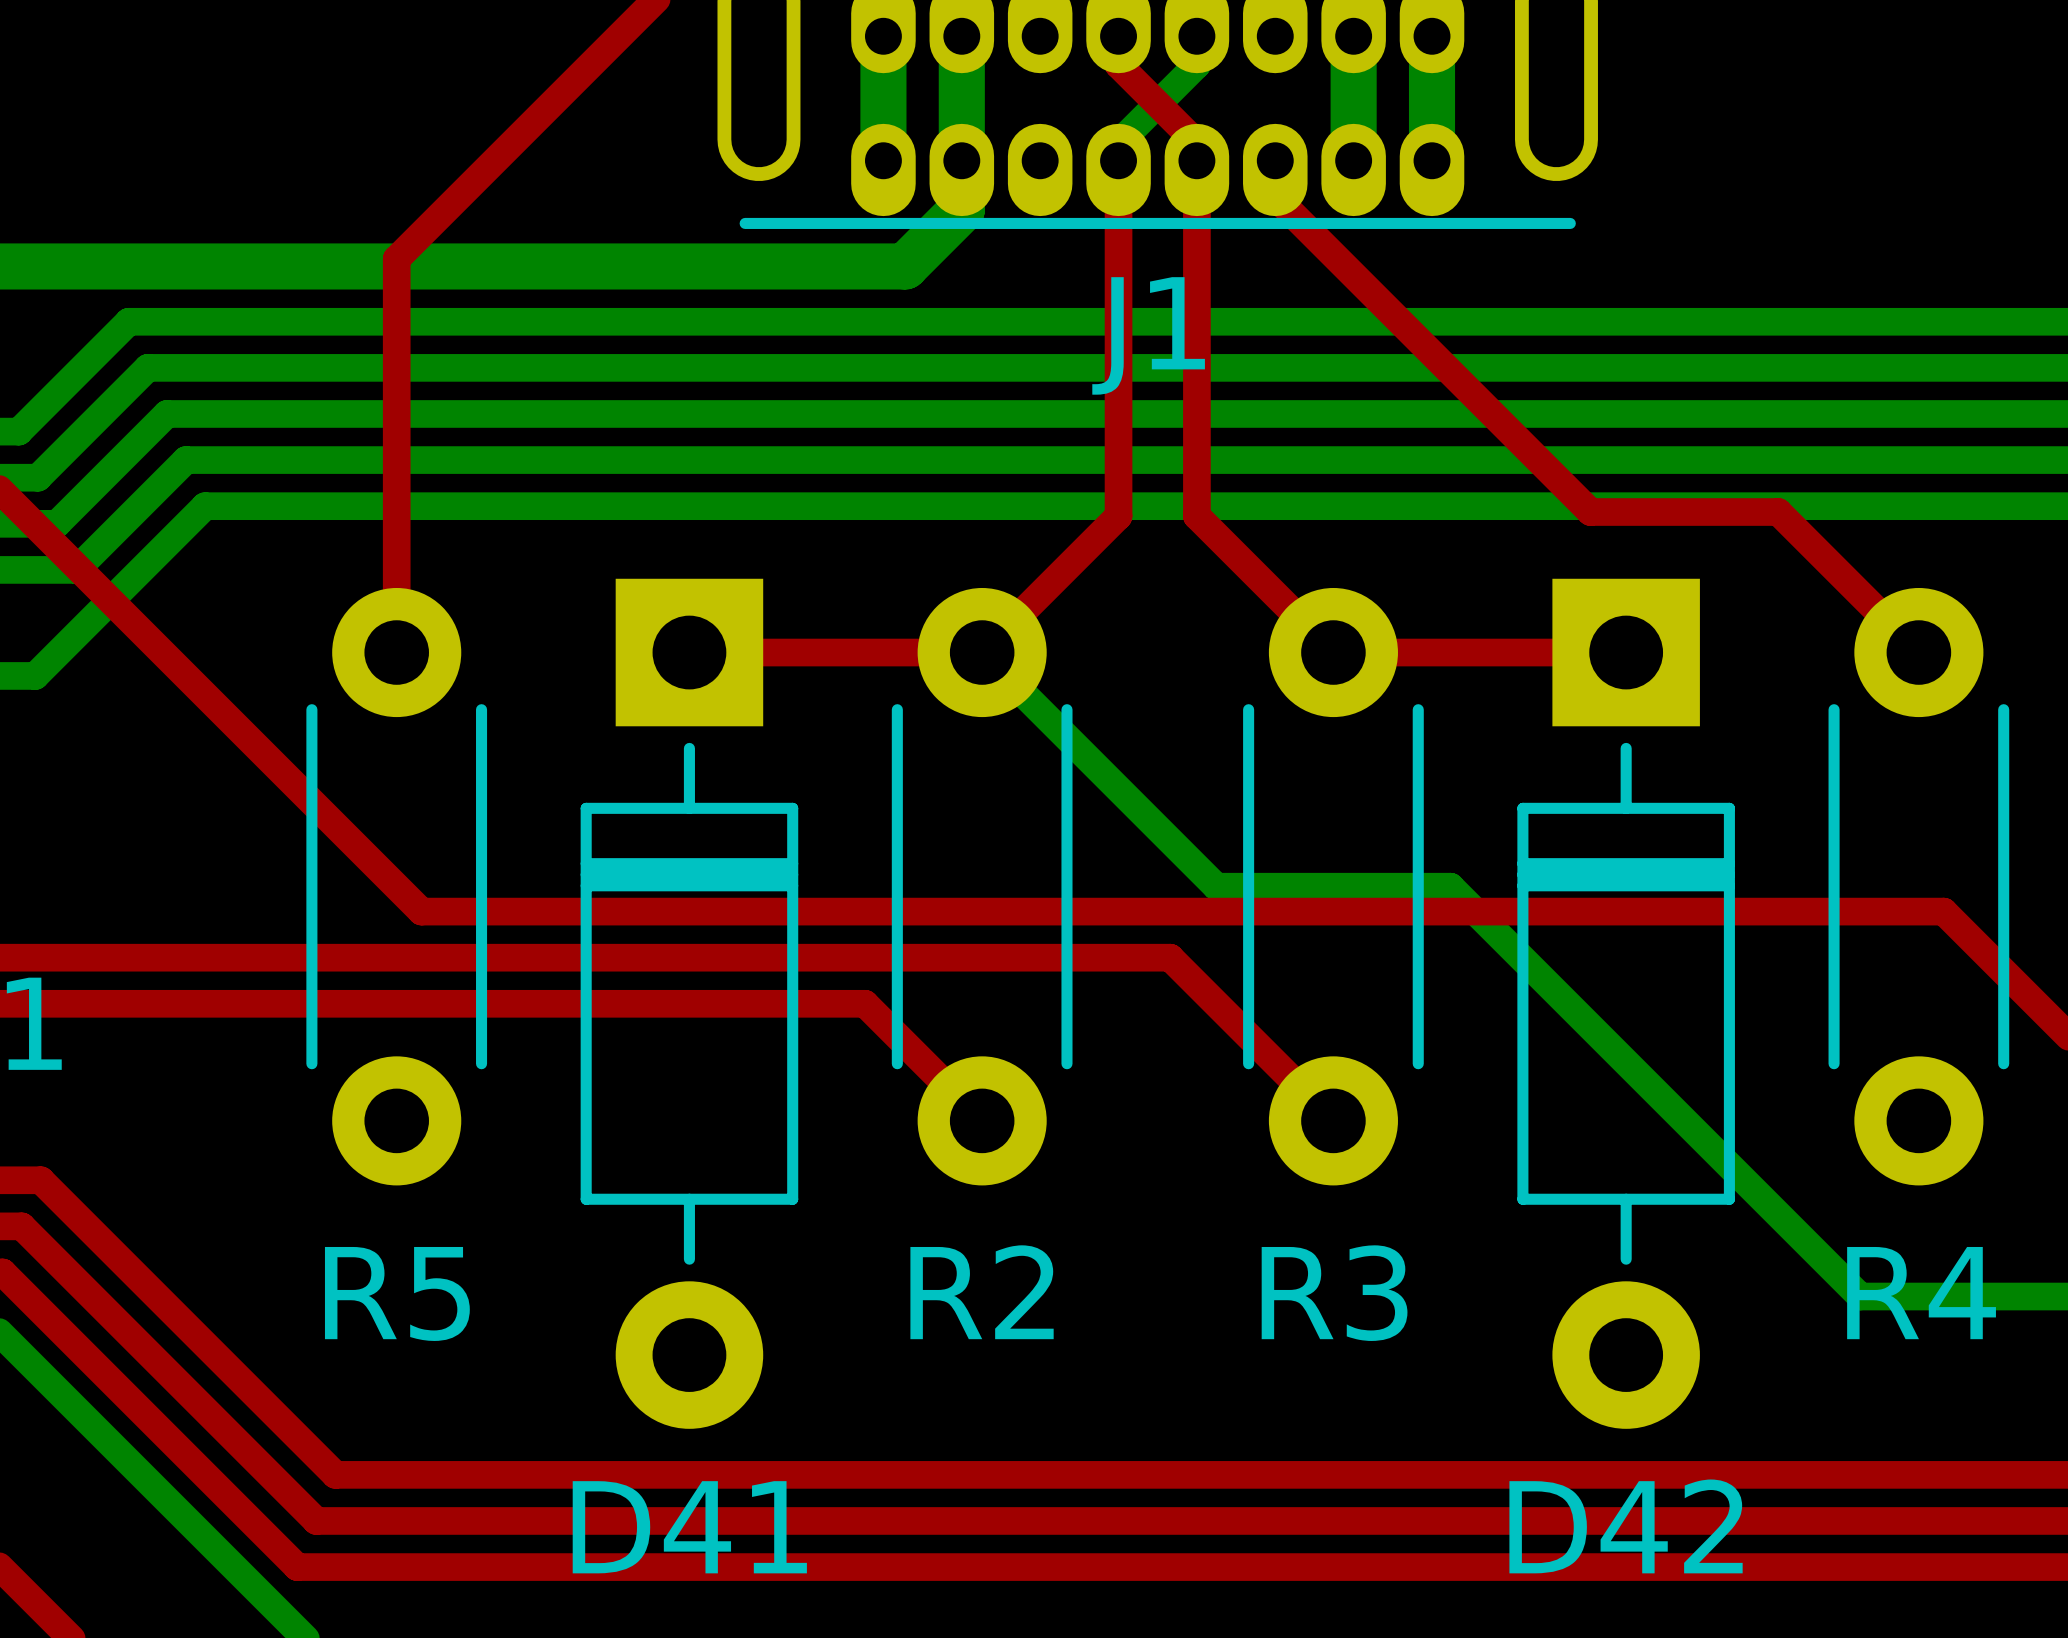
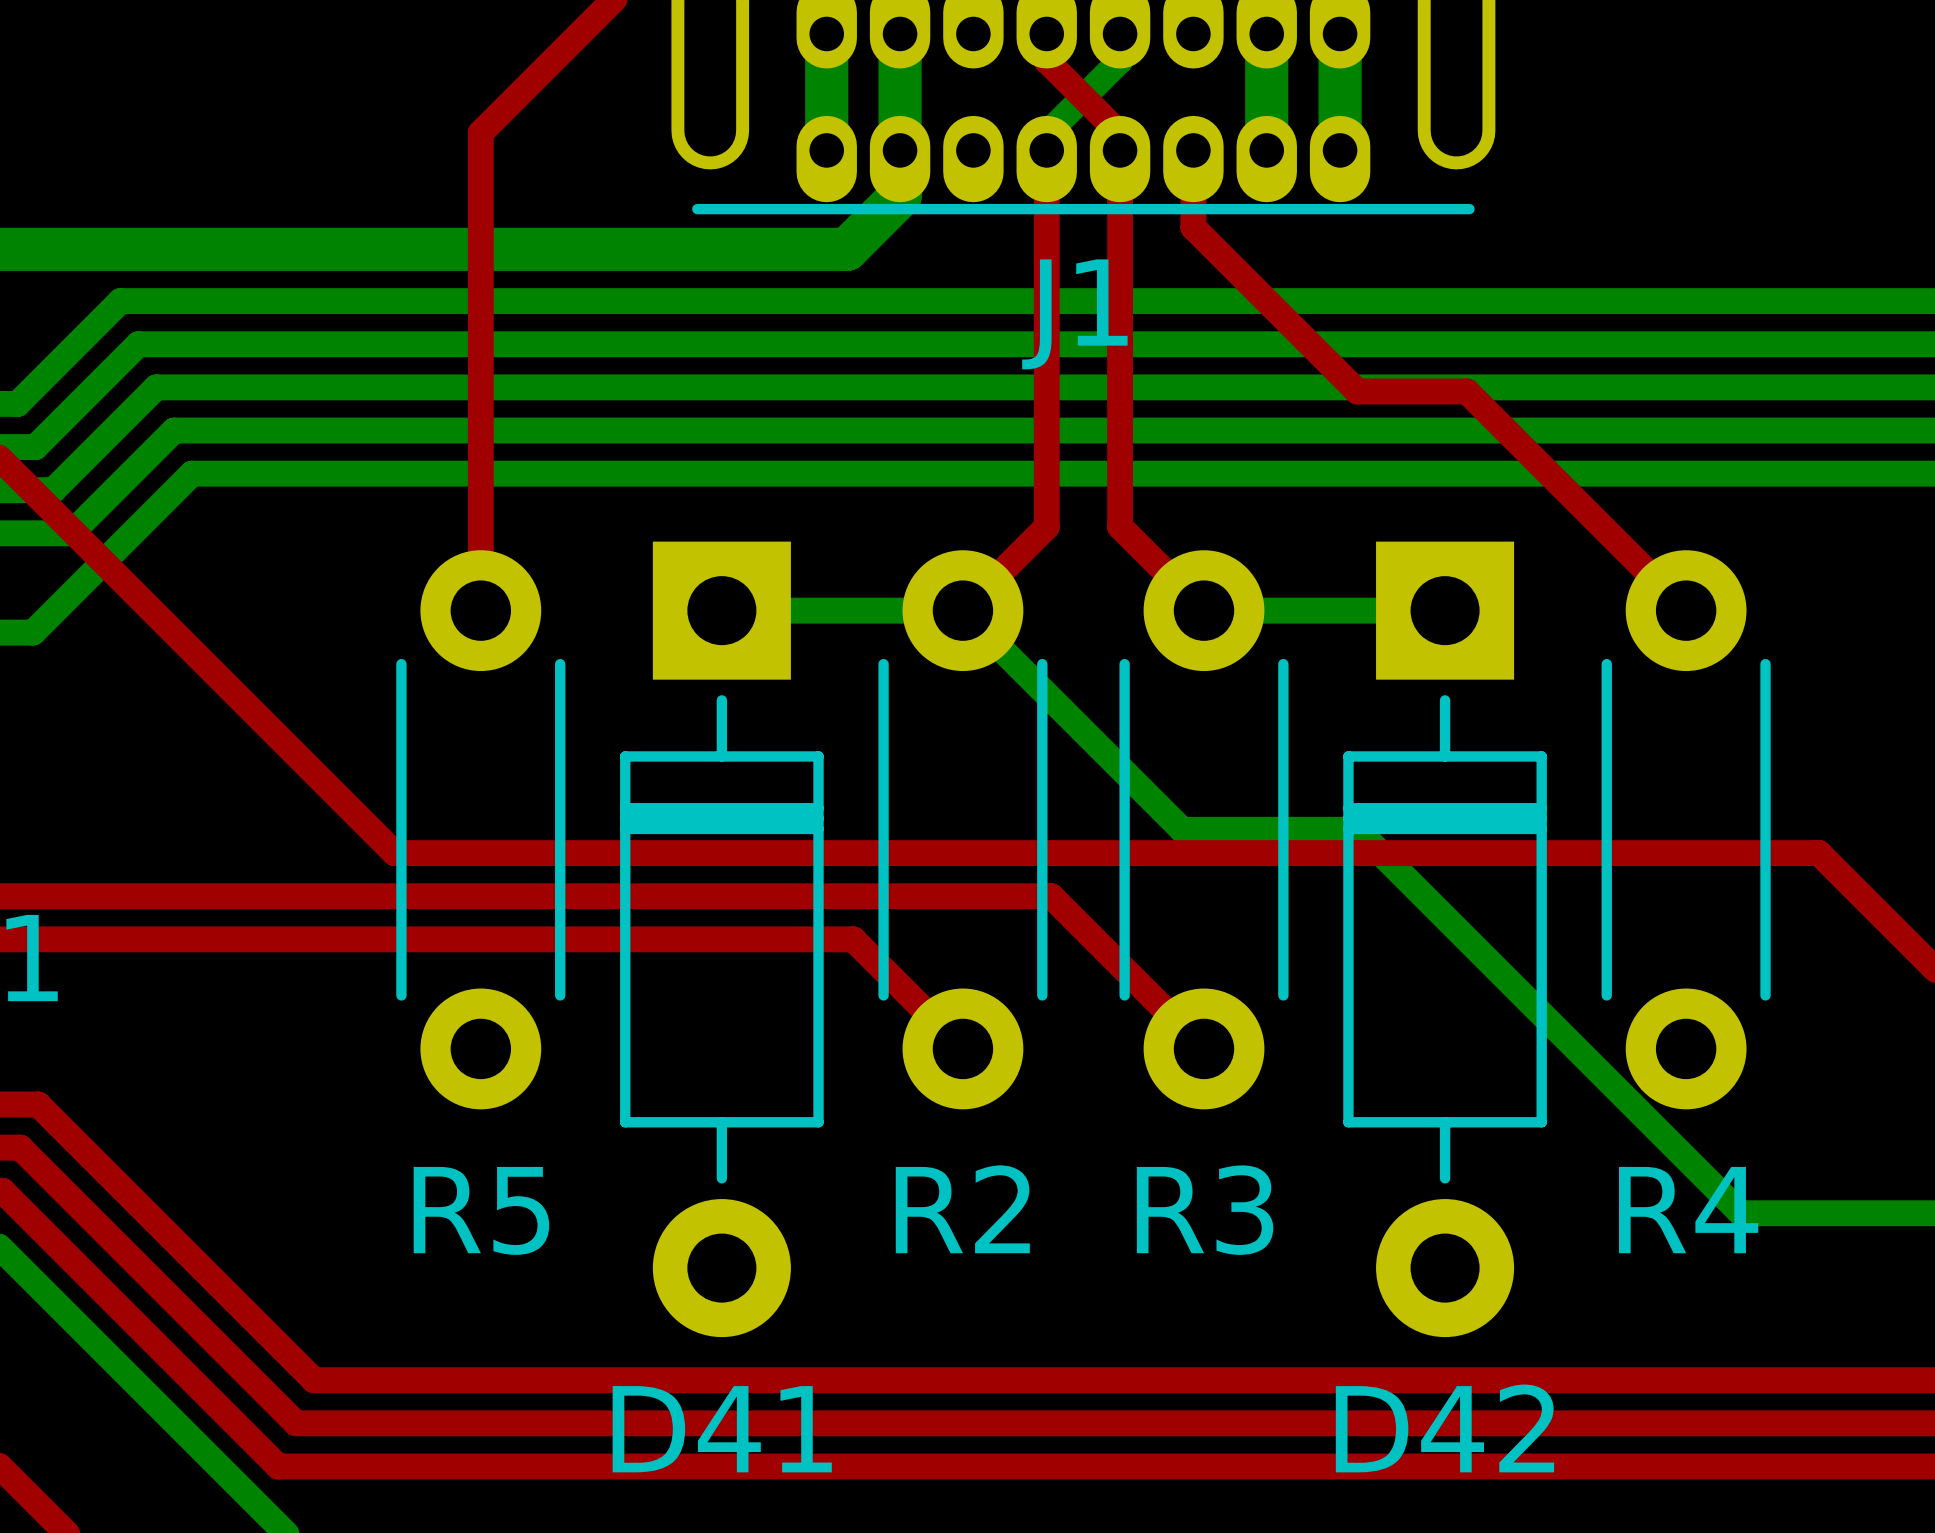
top track: (513, 141) (396, 258) (396, 652) -> (480, 132) (480, 610)
top track: (1275, 196) (1590, 512) (1778, 512) (1918, 652) -> (1193, 184) (1193, 227) (1357, 391) (1466, 391) (1686, 610)
top track: (1118, 516) (982, 652) (689, 652) -> (1046, 483) (1046, 526) (962, 610)
top track: (1196, 516) (1333, 652) (1626, 652) -> (1120, 482) (1120, 526) (1204, 610)
bottom track: (982, 652) (1216, 886) (1263, 886) -> (721, 610) (962, 610) (1182, 829)
bottom track: none -> (1204, 610) (1445, 610)
R5 position: (396, 886) -> (480, 829)
R2 position: (982, 886) -> (962, 829)
R3 position: (1333, 886) -> (1204, 829)
R4 position: (1918, 886) -> (1686, 829)
top track: (1123, 957) (1170, 957) (1333, 1120) -> (1051, 896) (1204, 1048)
D41 position: (689, 1003) -> (721, 939)
top track: (865, 1003) (982, 1120) -> (809, 939) (853, 939) (962, 1048)
D42 position: (1626, 1003) -> (1445, 939)

